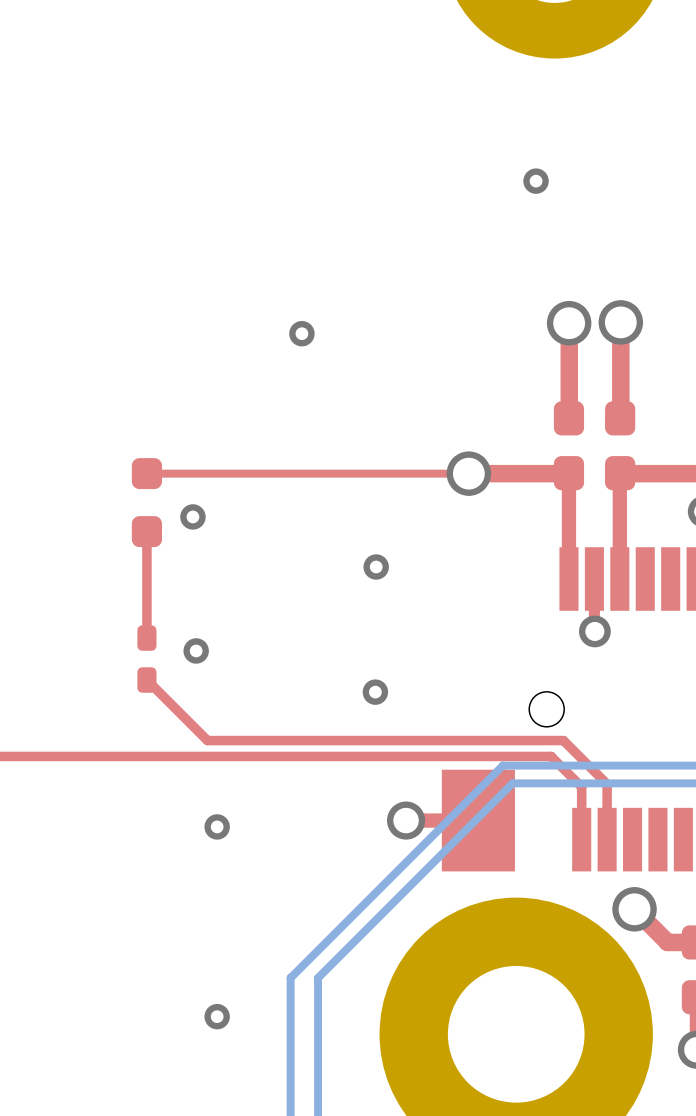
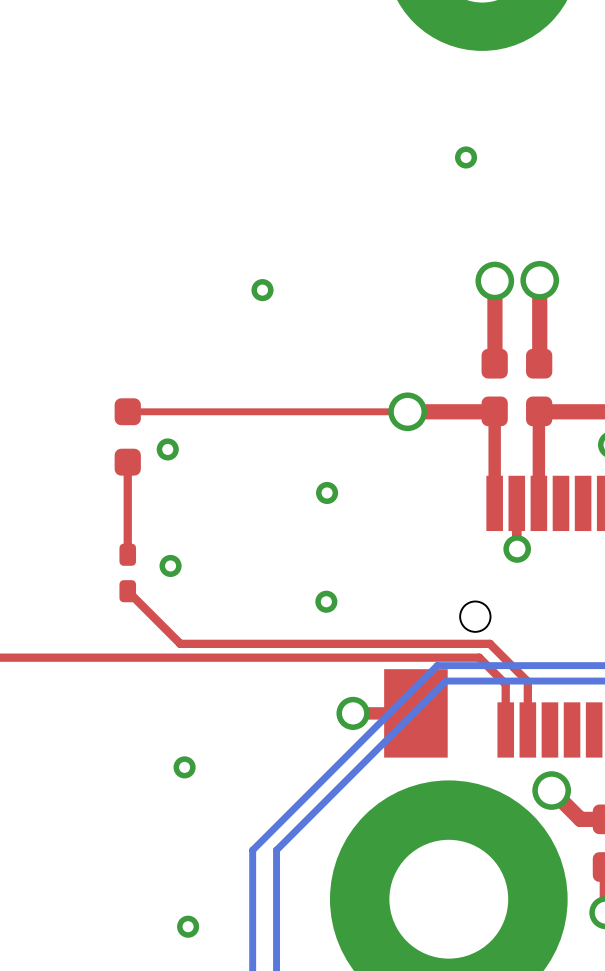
via position: (217, 826) -> (184, 767)
via position: (217, 1016) -> (188, 926)

